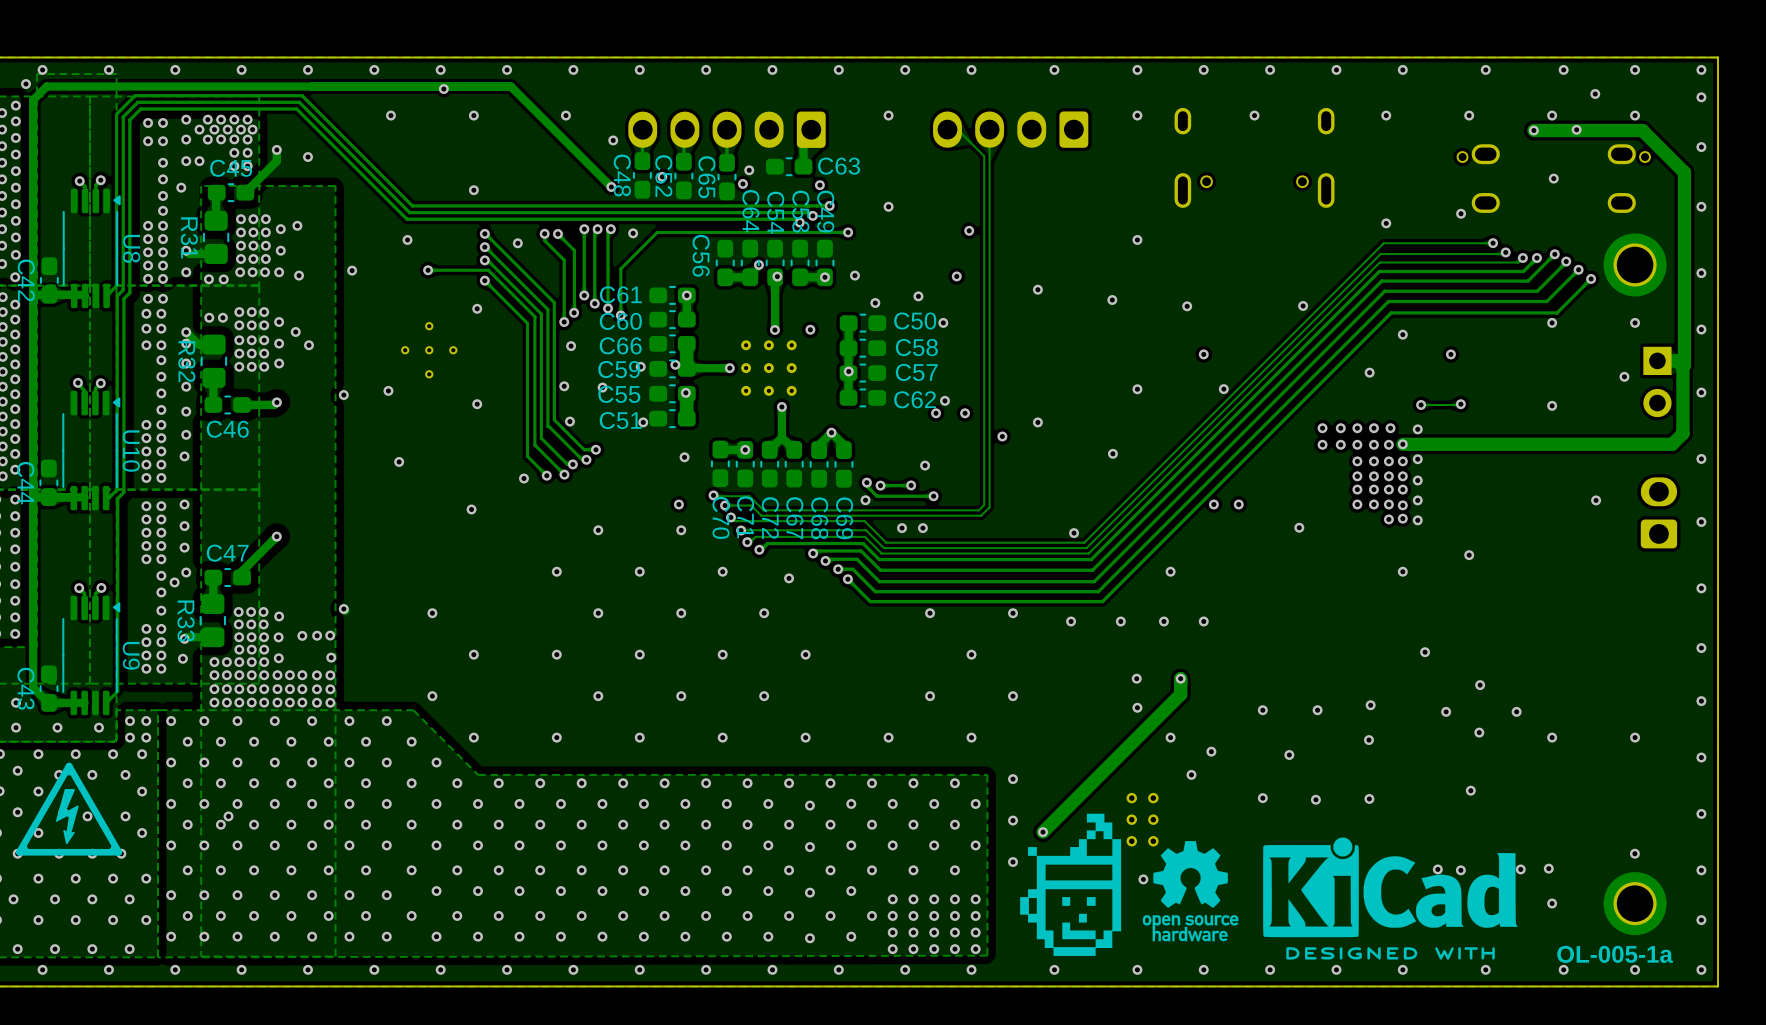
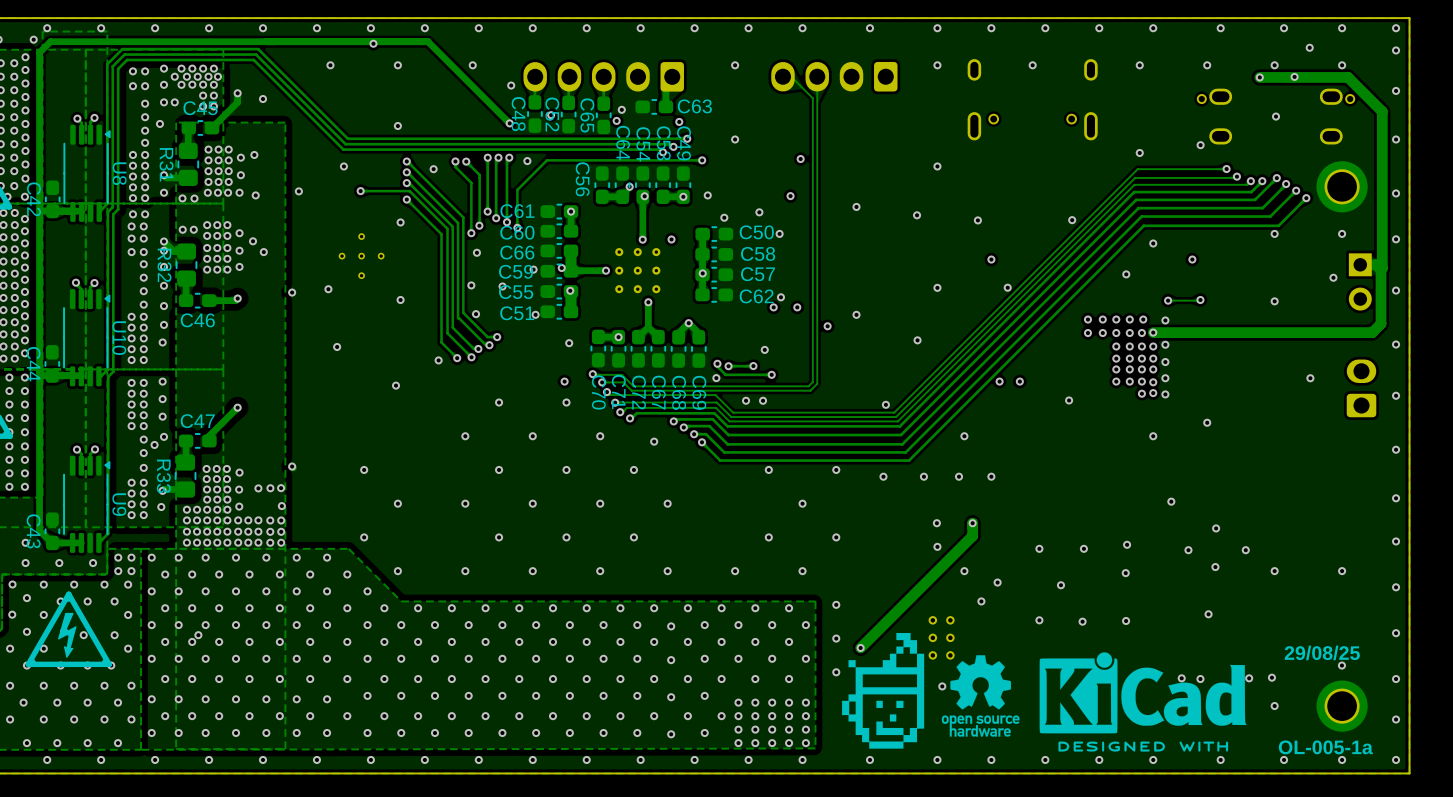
text: none -> 29/08/25 (1322, 652)

